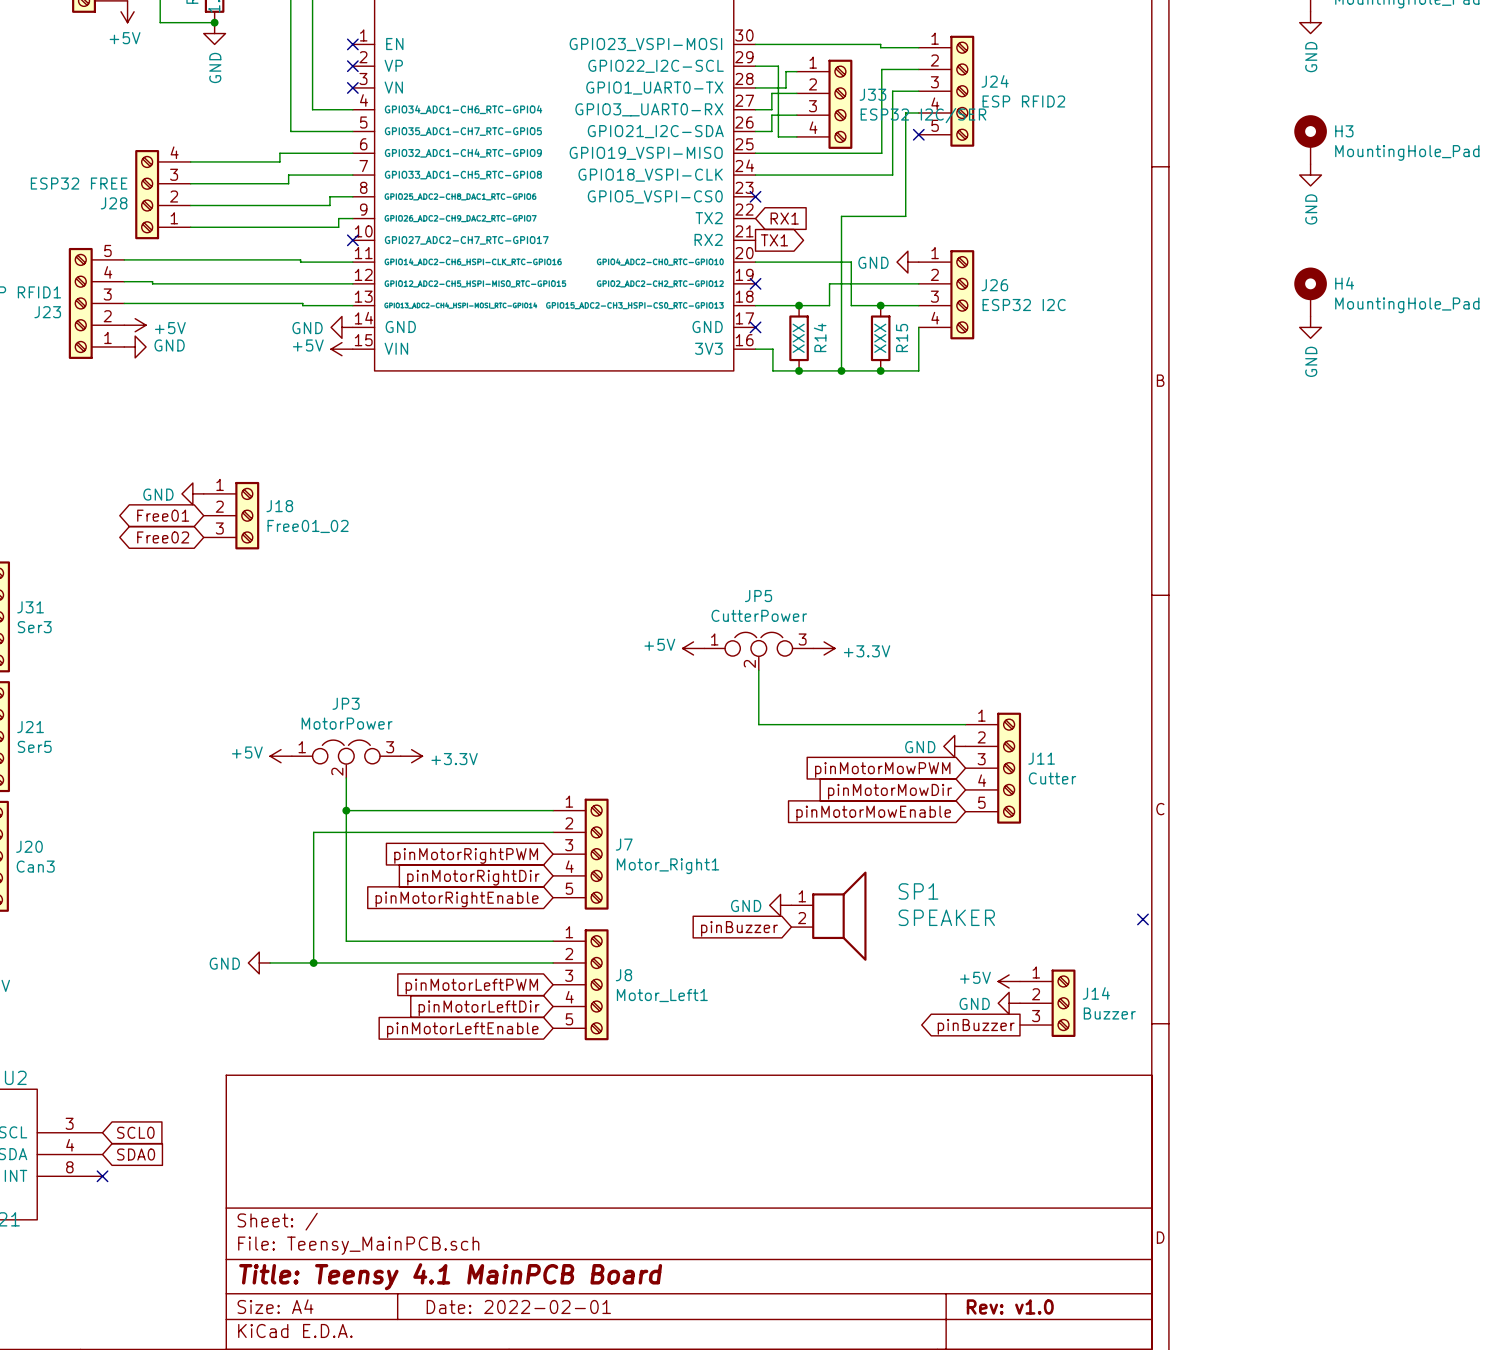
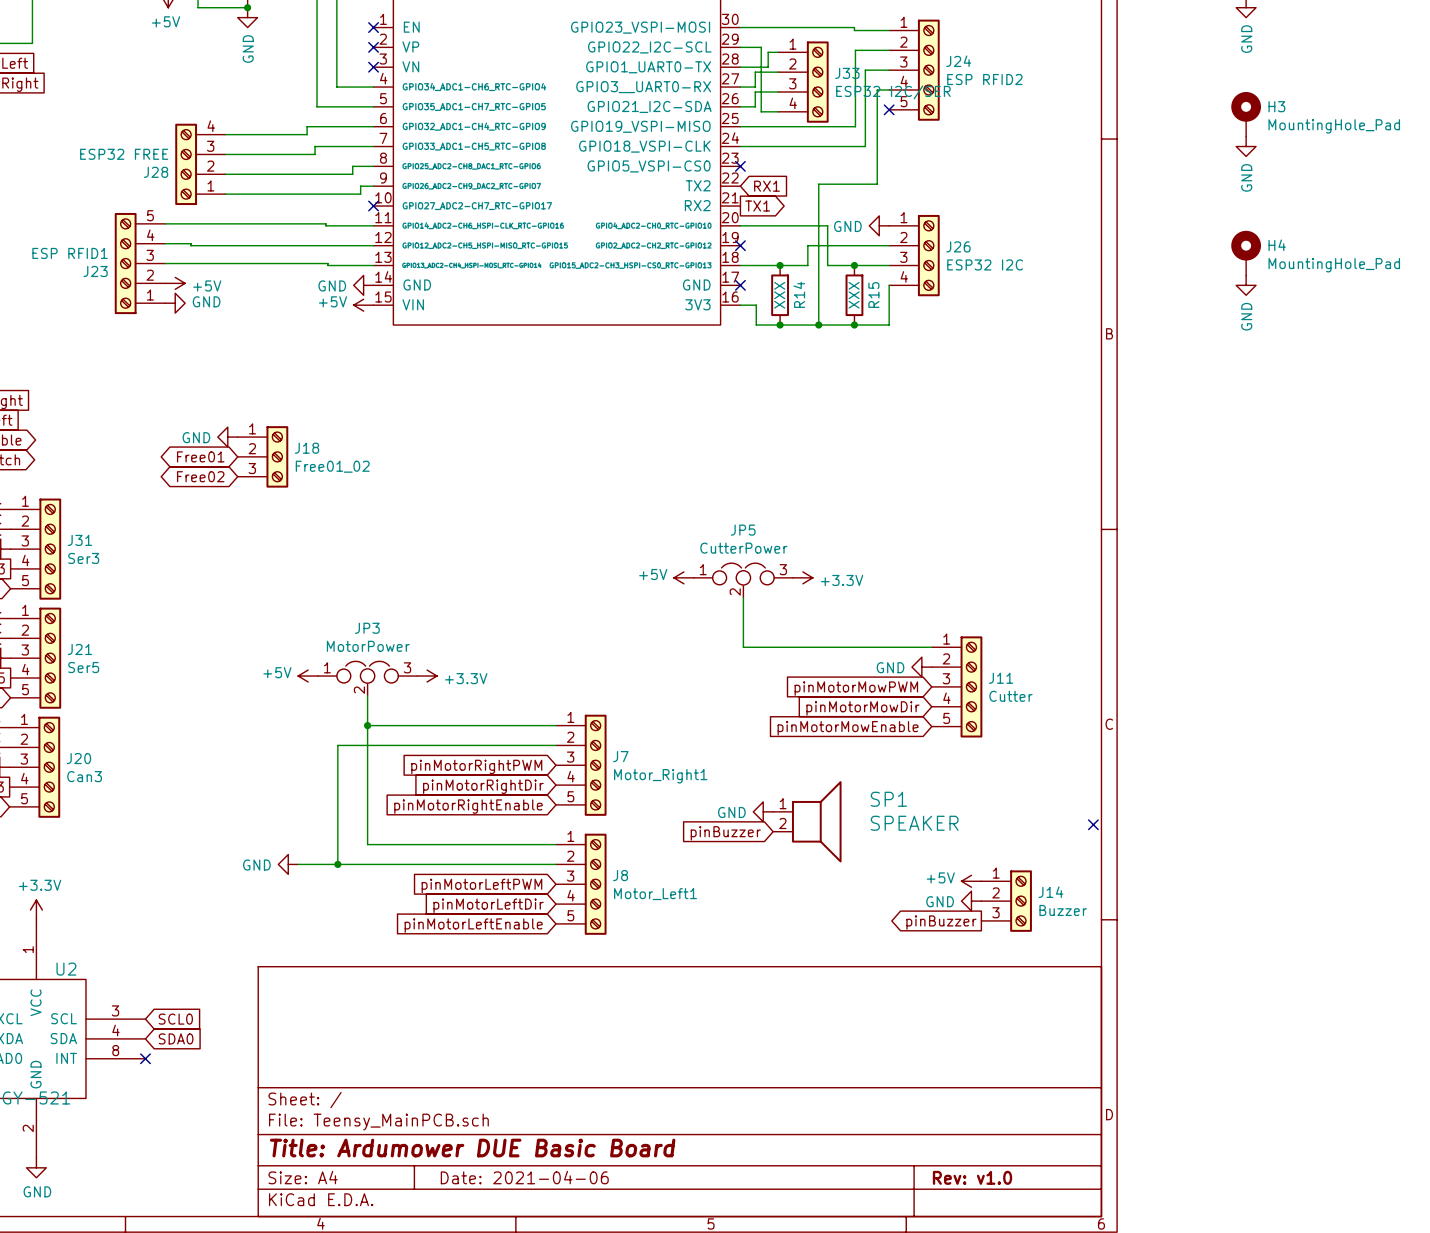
title block: Title: Teensy 4.1 MainPCB Board (450, 1276) -> Title: Ardumower DUE Basic Board (472, 1148)
title block: Date: 2022-02-01 (518, 1306) -> Date: 2021-04-06 (524, 1177)

